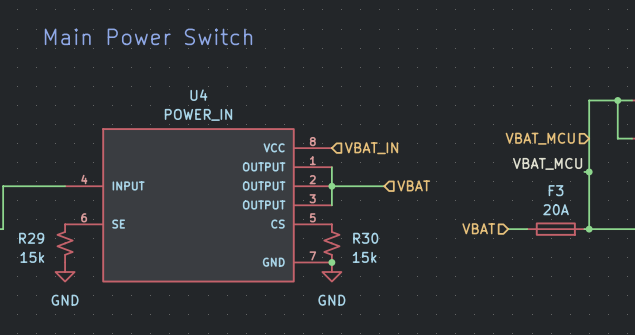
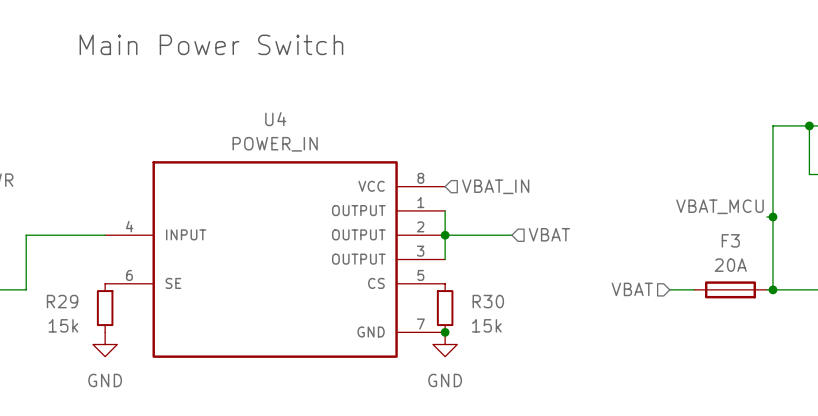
hierarchical label: VBAT_MCU (540, 138) -> none
R29 symbol: [57, 224, 73, 263] -> [96, 283, 114, 333]
R30 symbol: [324, 224, 340, 263] -> [436, 283, 454, 333]

